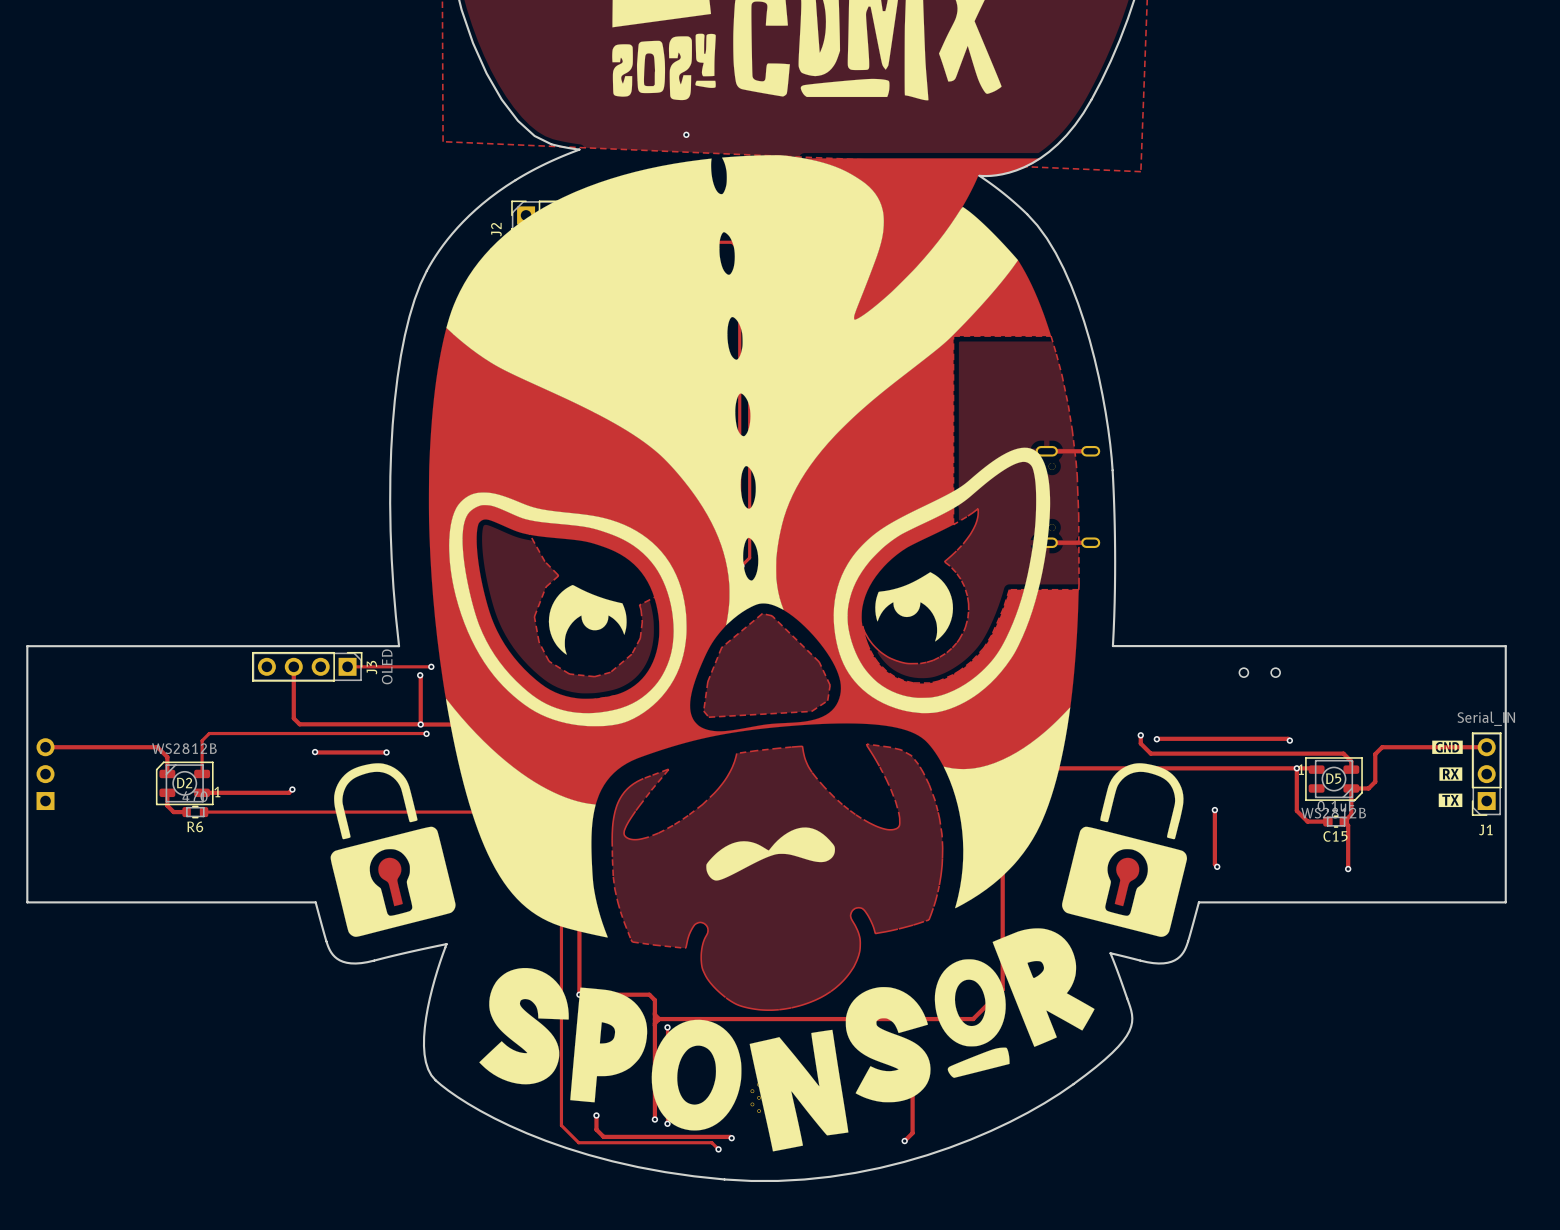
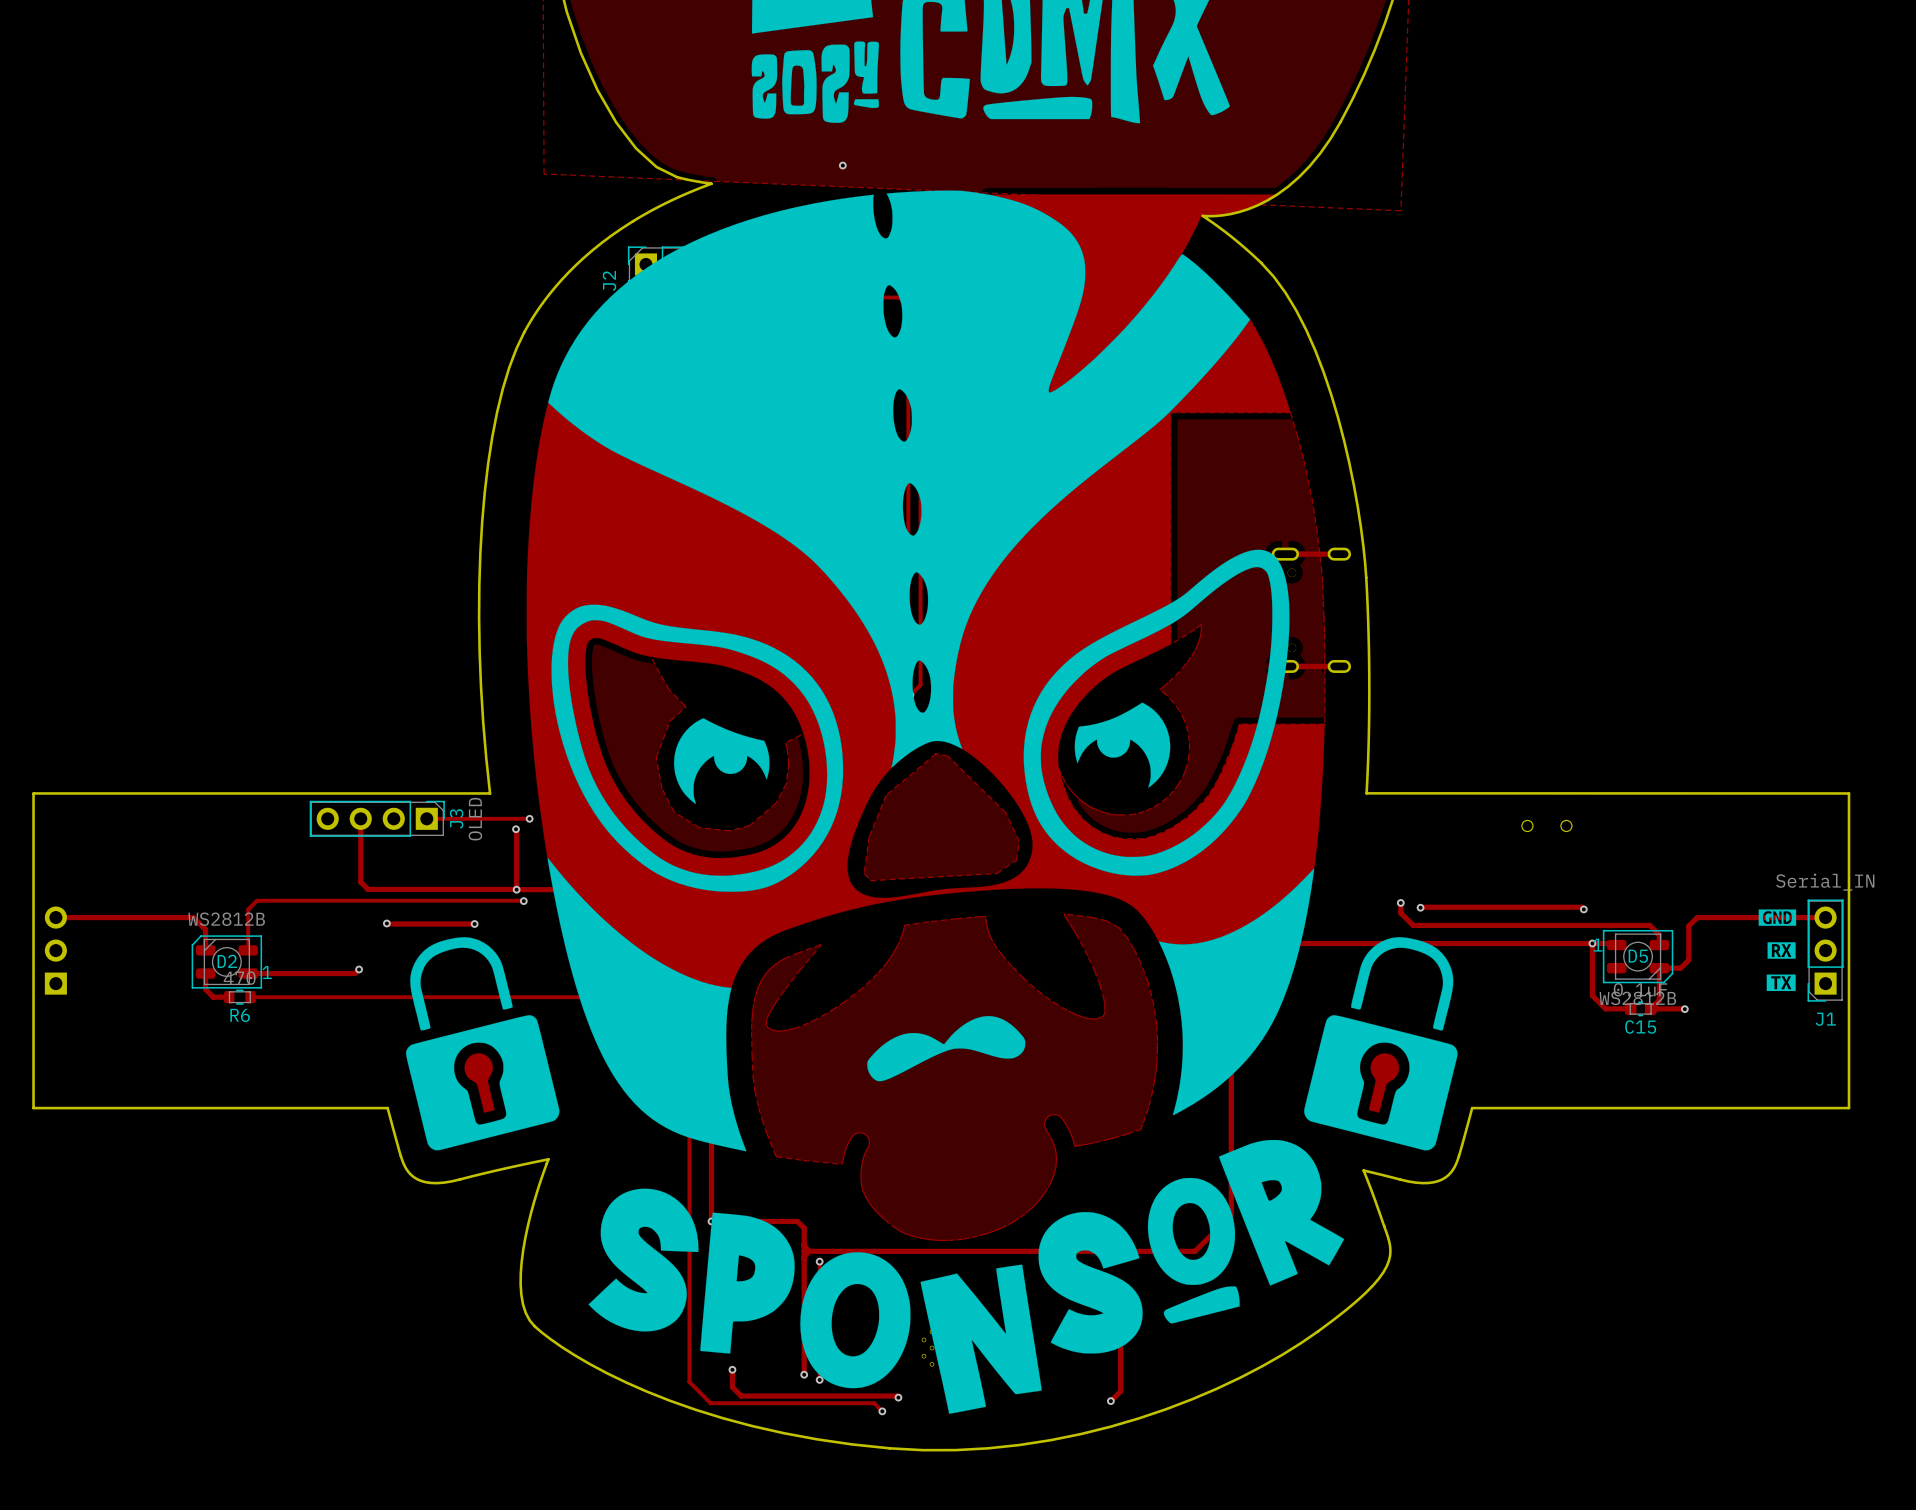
track: (1214, 810) (1214, 864) (1217, 866) -> none
via: (1214, 810) -> none
track: (1344, 821) (1348, 825) (1348, 869) -> (1650, 1008) (1684, 1009)
via: (1217, 866) -> none
via position: (1348, 869) -> (1684, 1009)

